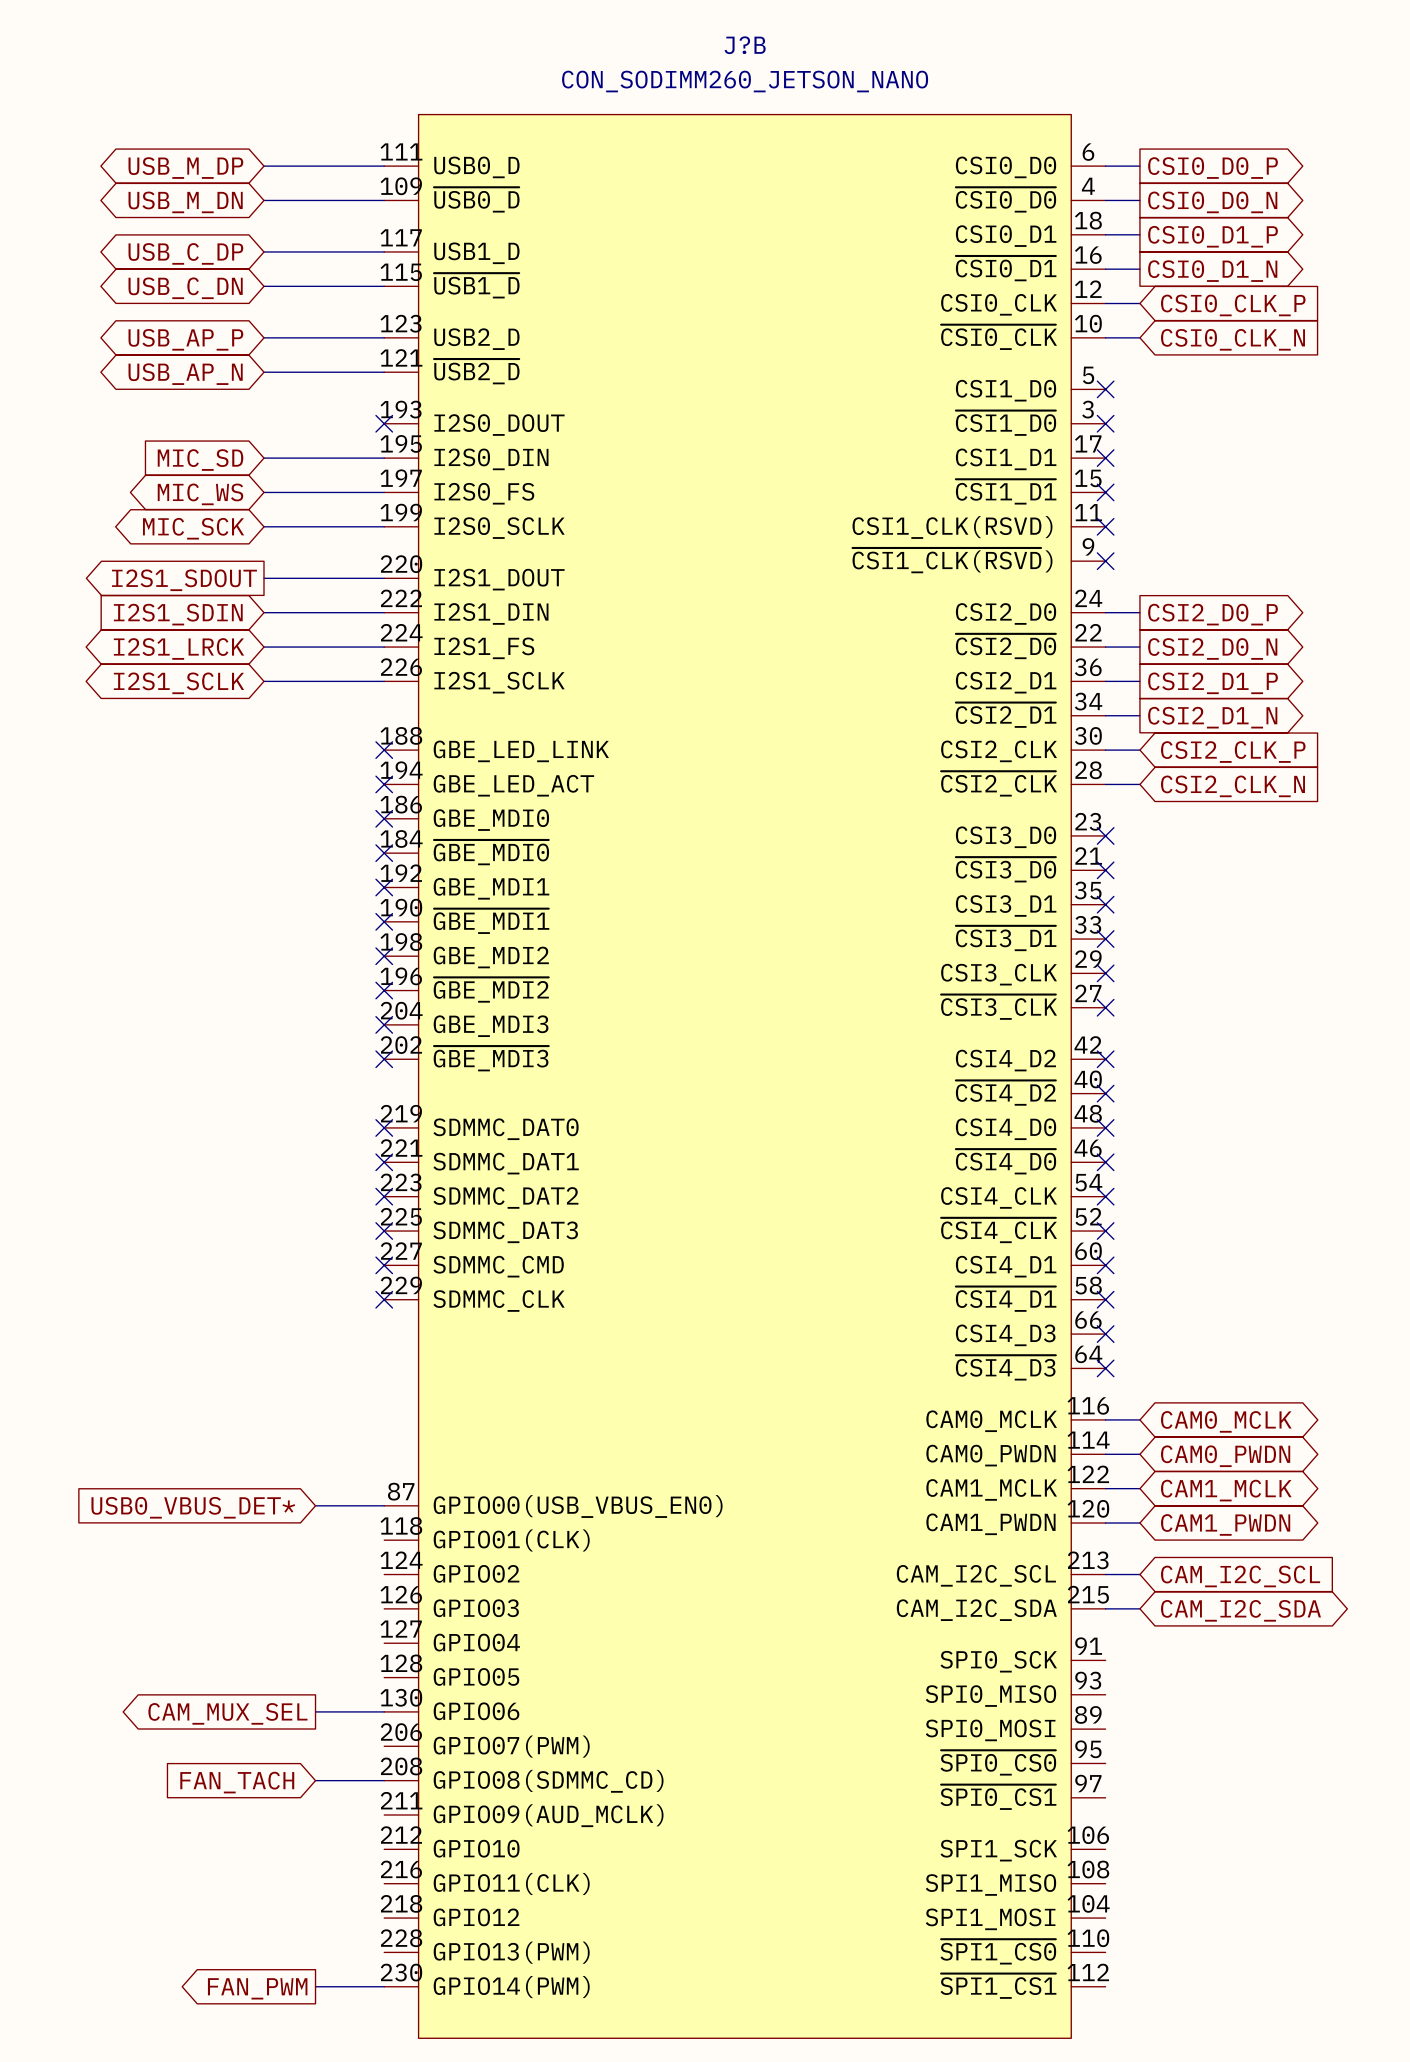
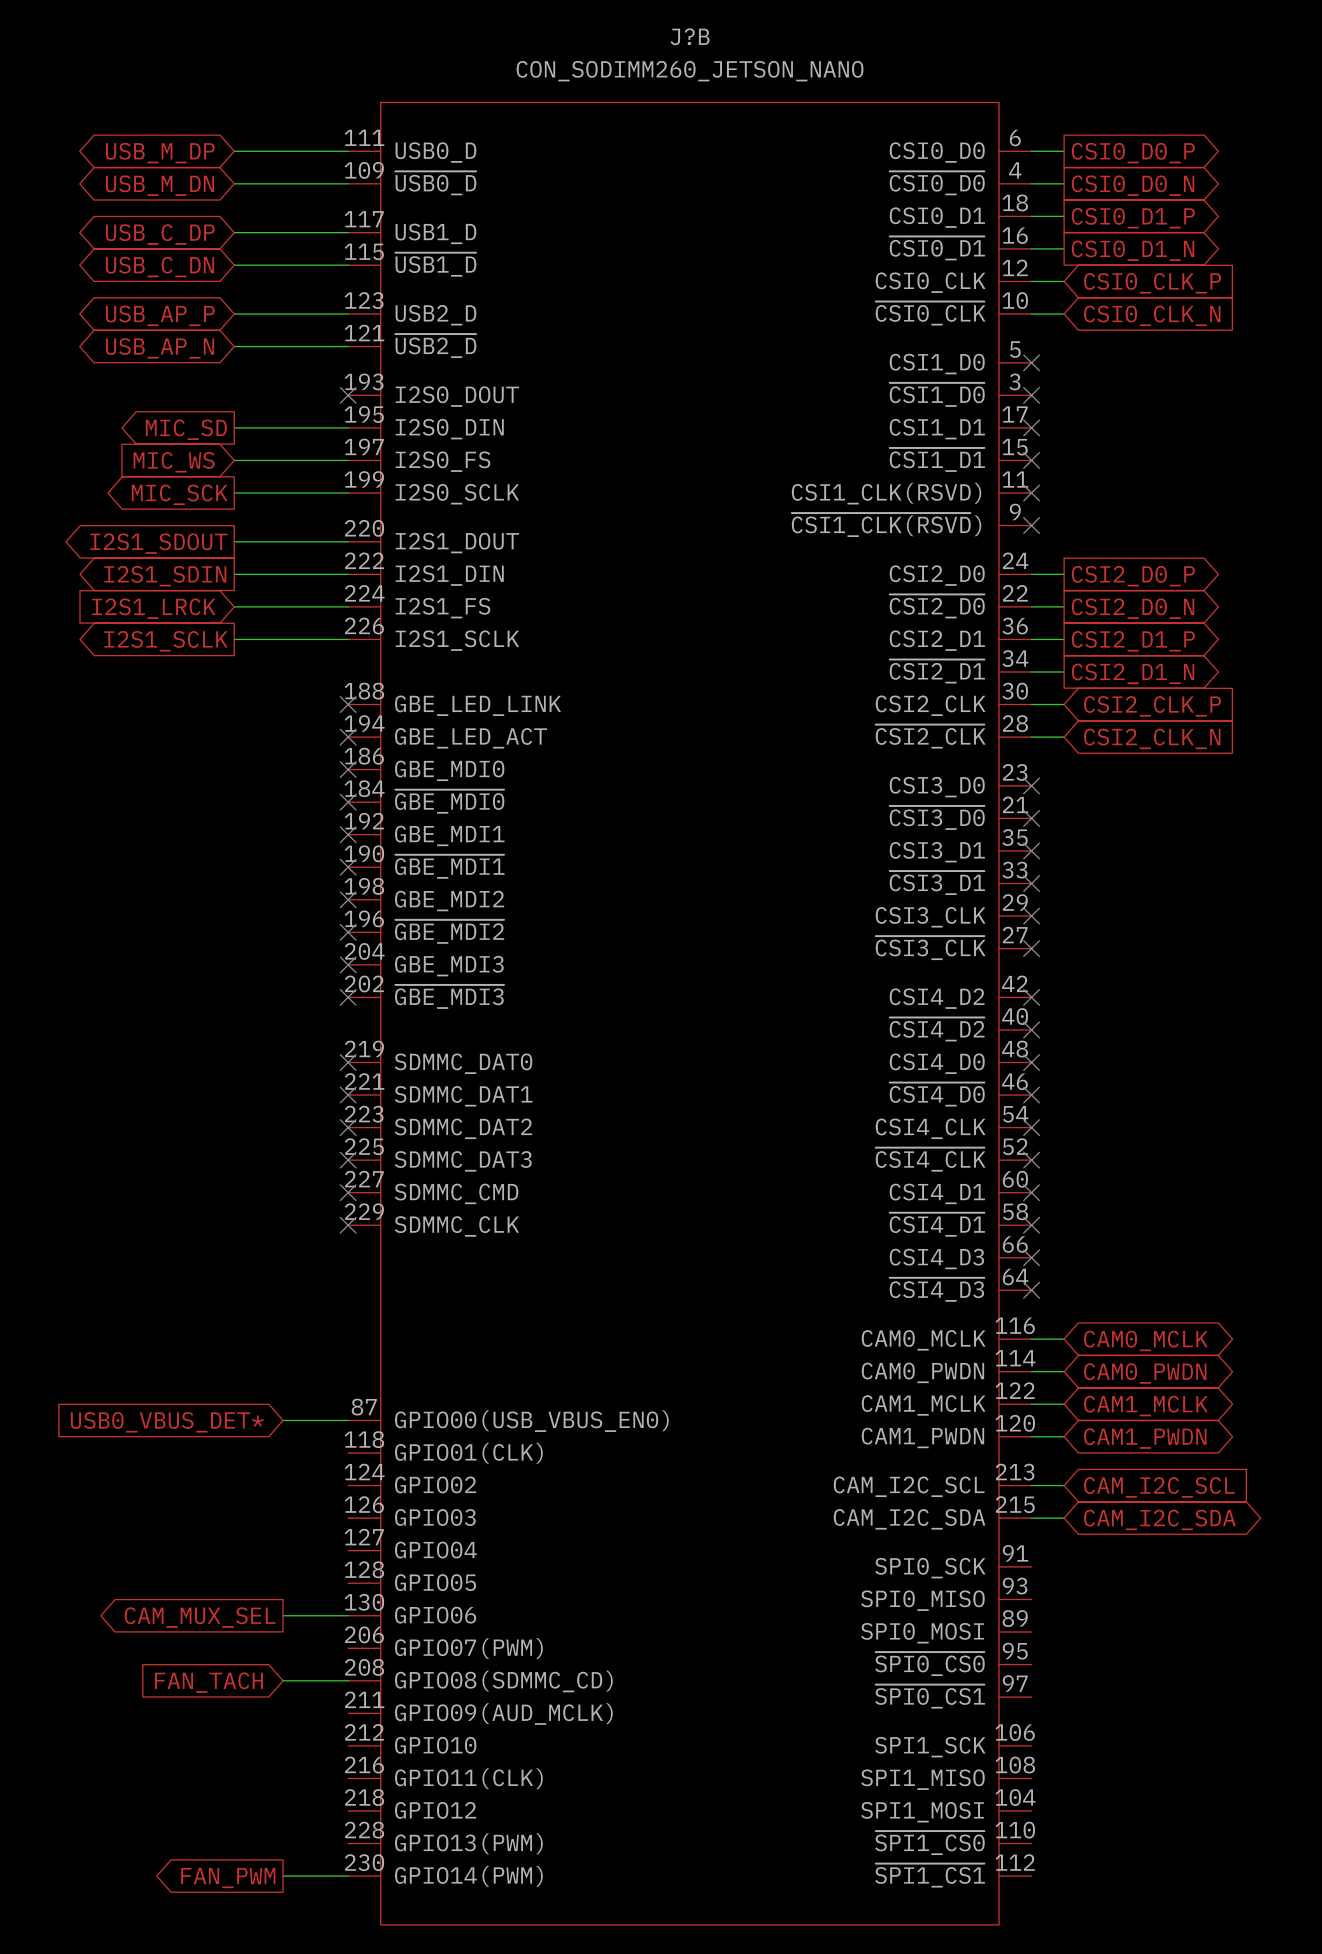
global label shape: input (200, 460) -> output (186, 429)
global label shape: bidirectional (200, 494) -> input (174, 462)
global label shape: bidirectional (193, 528) -> output (179, 494)
global label shape: input (178, 614) -> output (165, 576)
global label shape: bidirectional (178, 648) -> input (153, 608)
global label shape: bidirectional (178, 683) -> output (165, 641)

